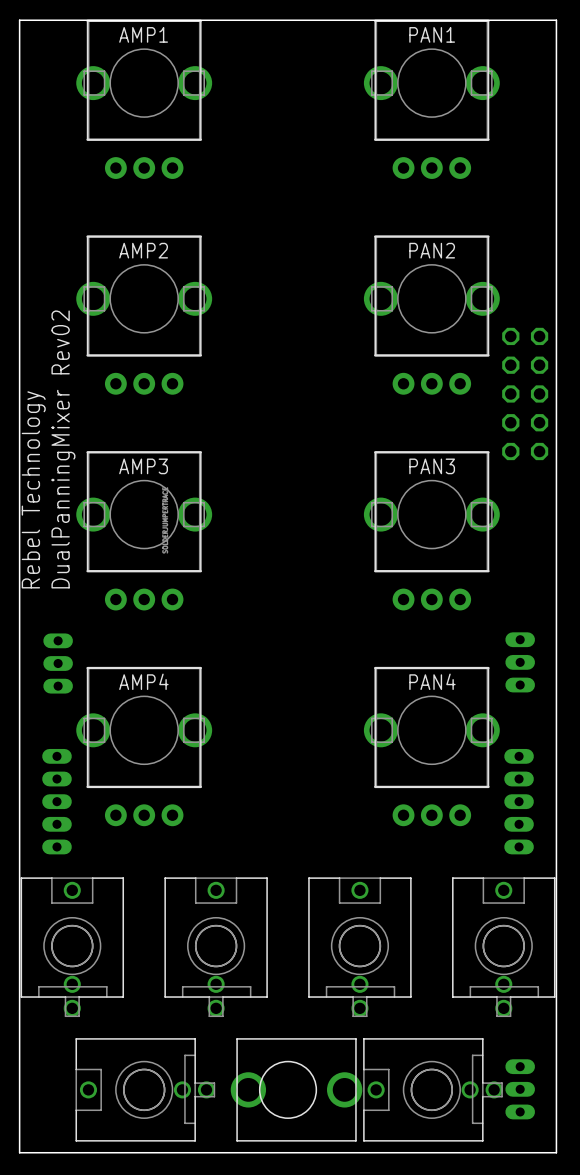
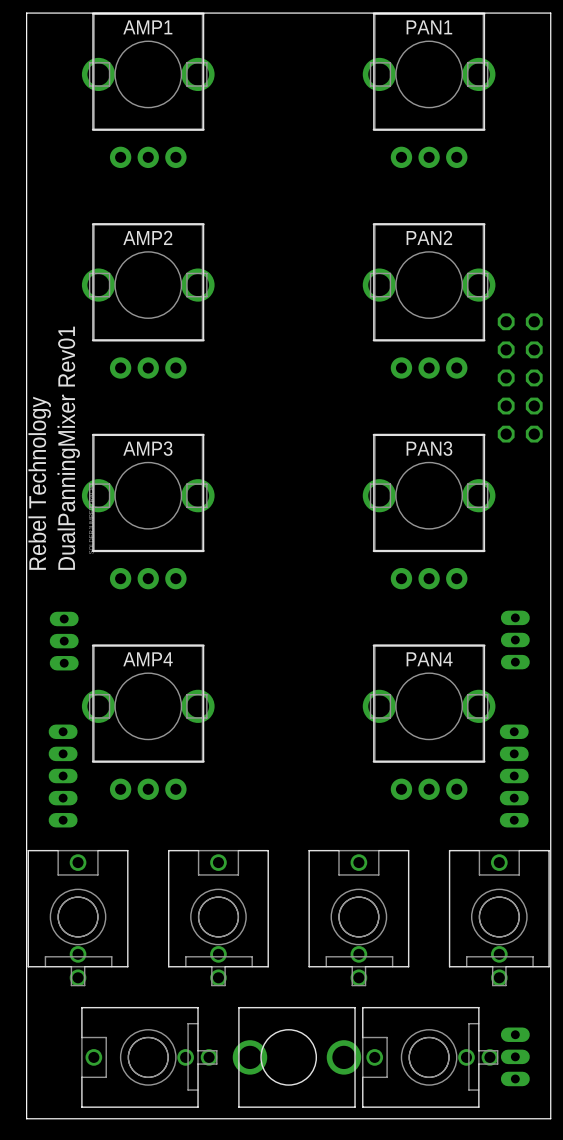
text: DualPanningMixer Rev02 (63, 449) -> DualPanningMixer Rev01 (68, 448)
part position: (165, 520) -> (91, 520)

